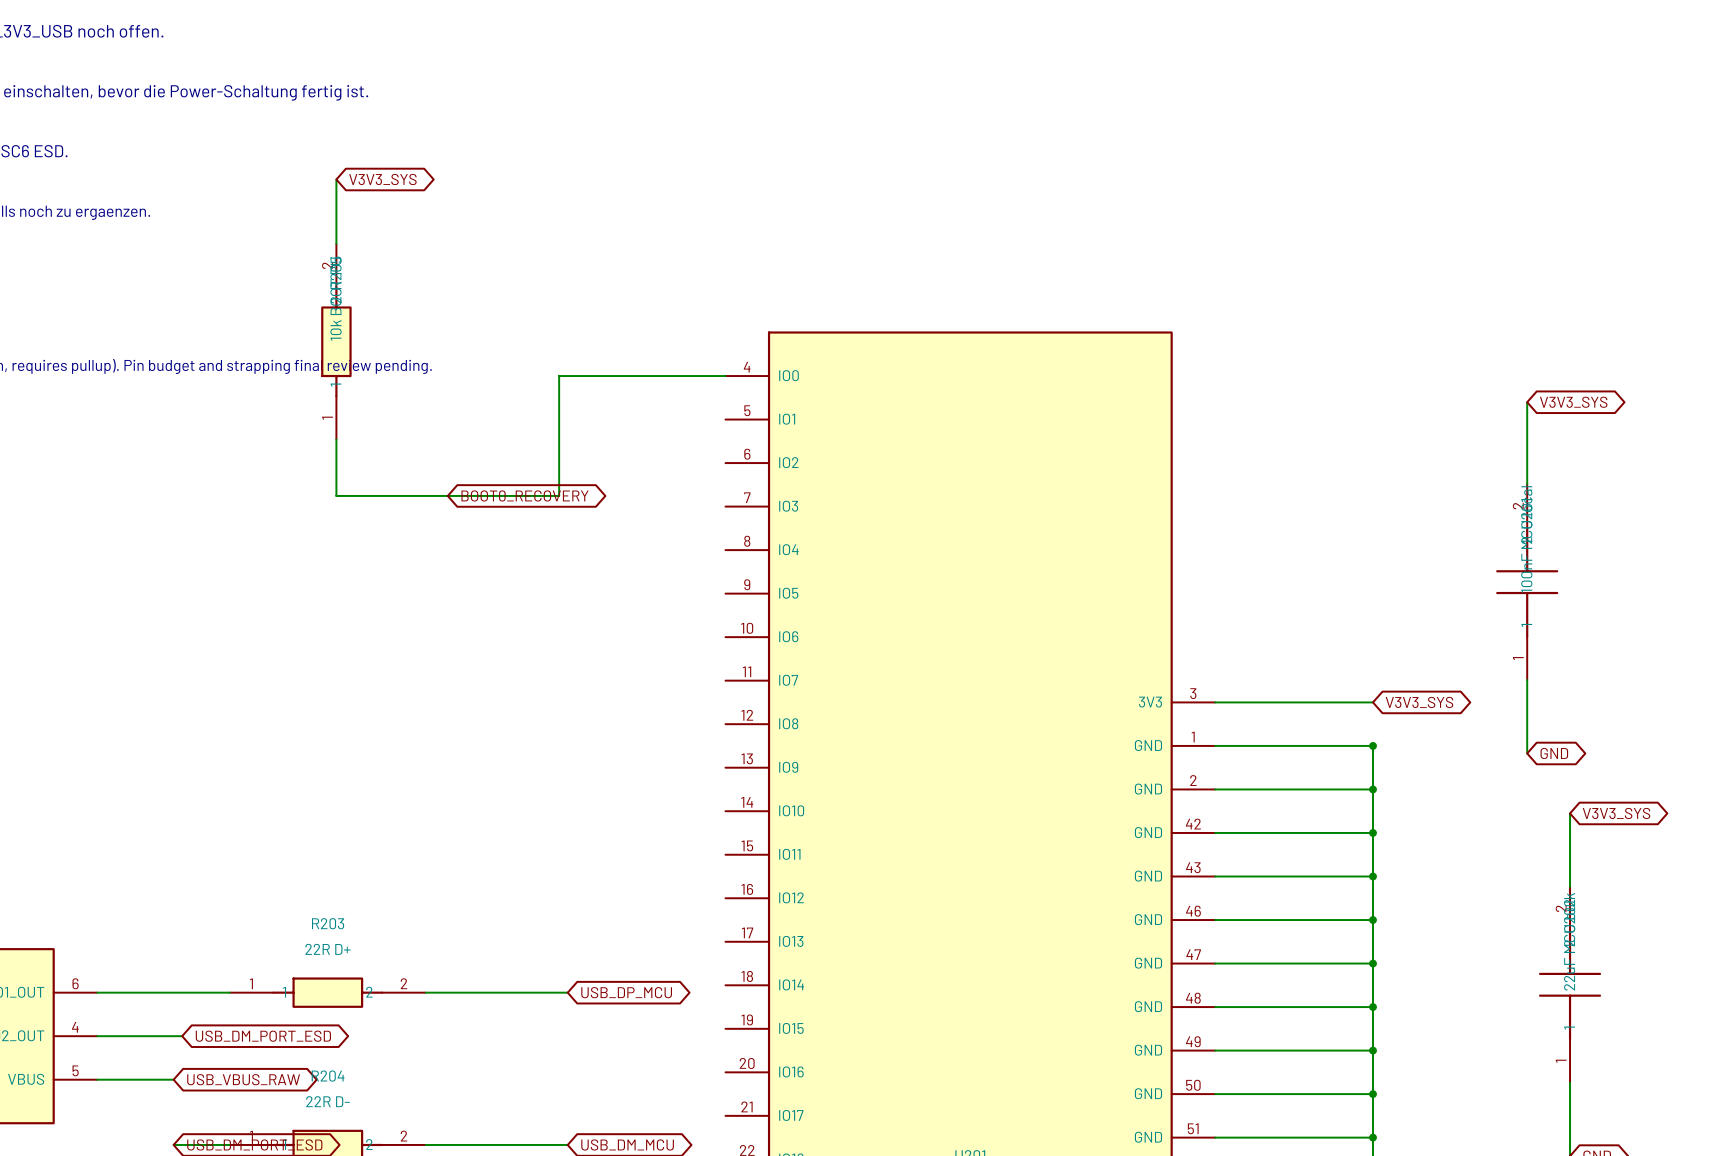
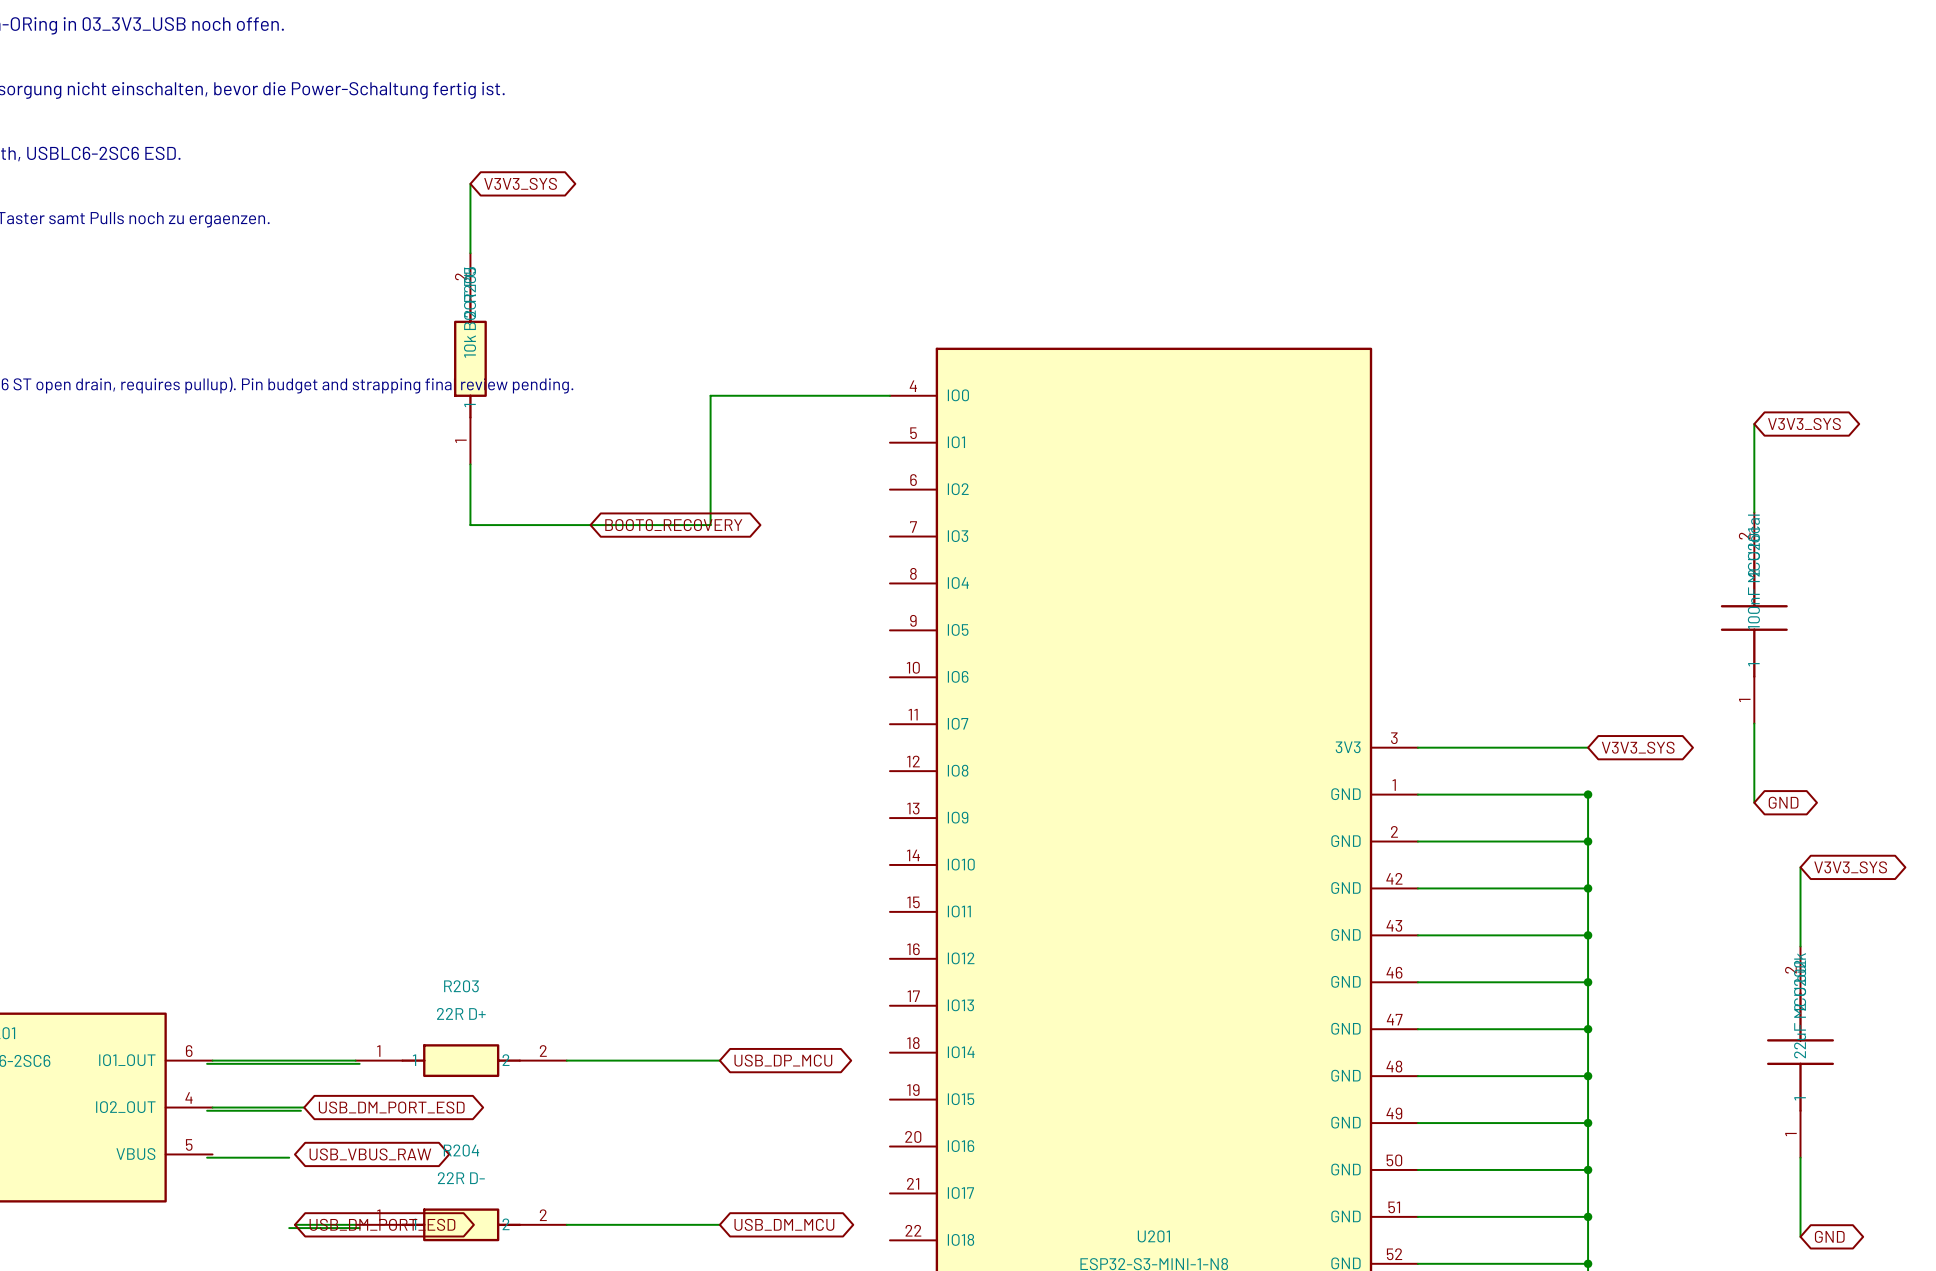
wire: none -> (207, 1063) (359, 1063)
wire: none -> (207, 1110) (300, 1110)
wire: (97, 1079) (173, 1079) -> none
wire: none -> (207, 1157) (289, 1157)
wire: none -> (289, 1228) (359, 1228)

